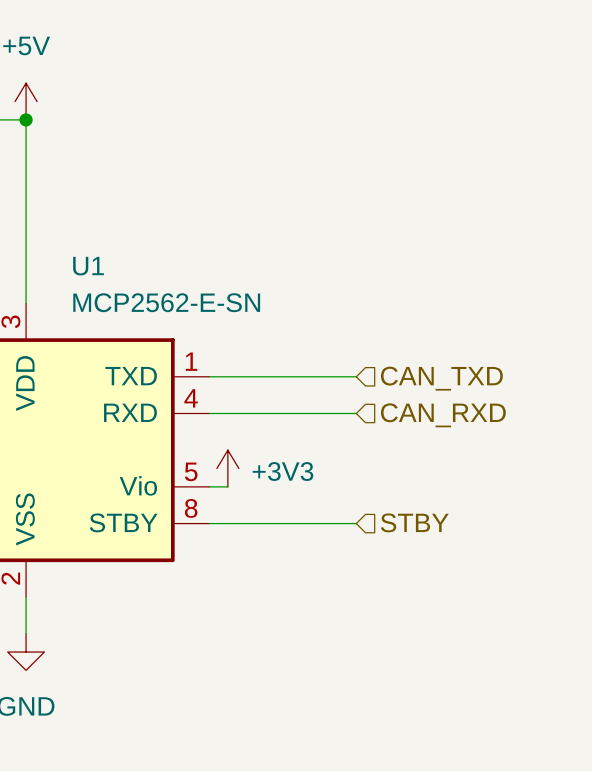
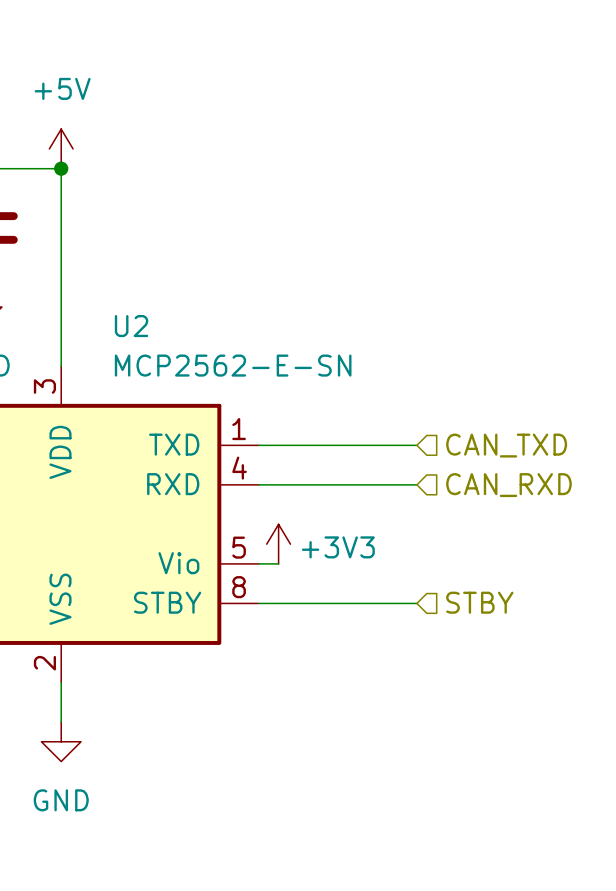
U1 name: U1 (88, 266) -> U2 (131, 326)

